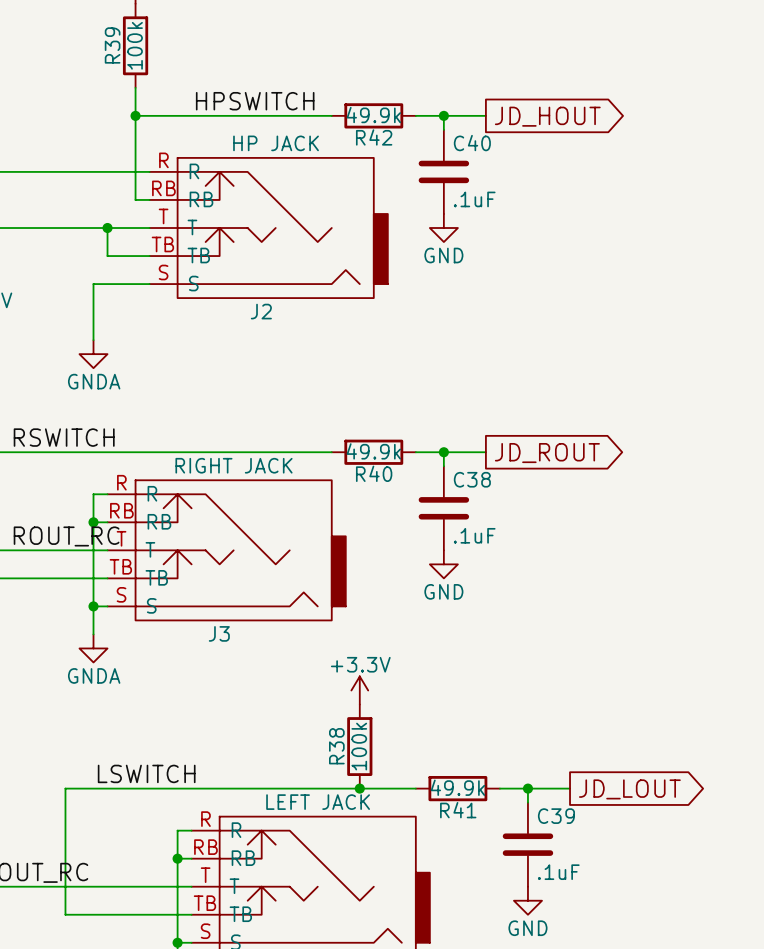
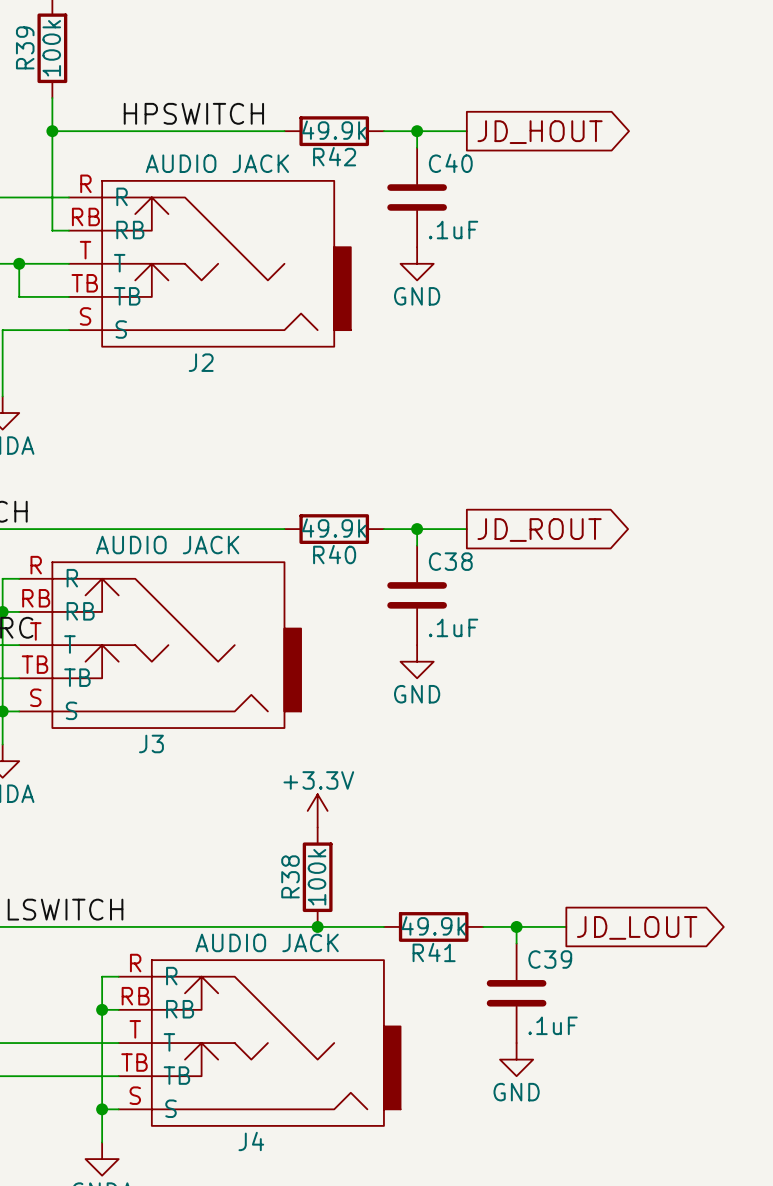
J2 value: HP JACK (276, 143) -> AUDIO JACK (217, 163)
J3 value: RIGHT JACK (233, 465) -> AUDIO JACK (167, 545)
J4 value: LEFT JACK (318, 802) -> AUDIO JACK (267, 942)

